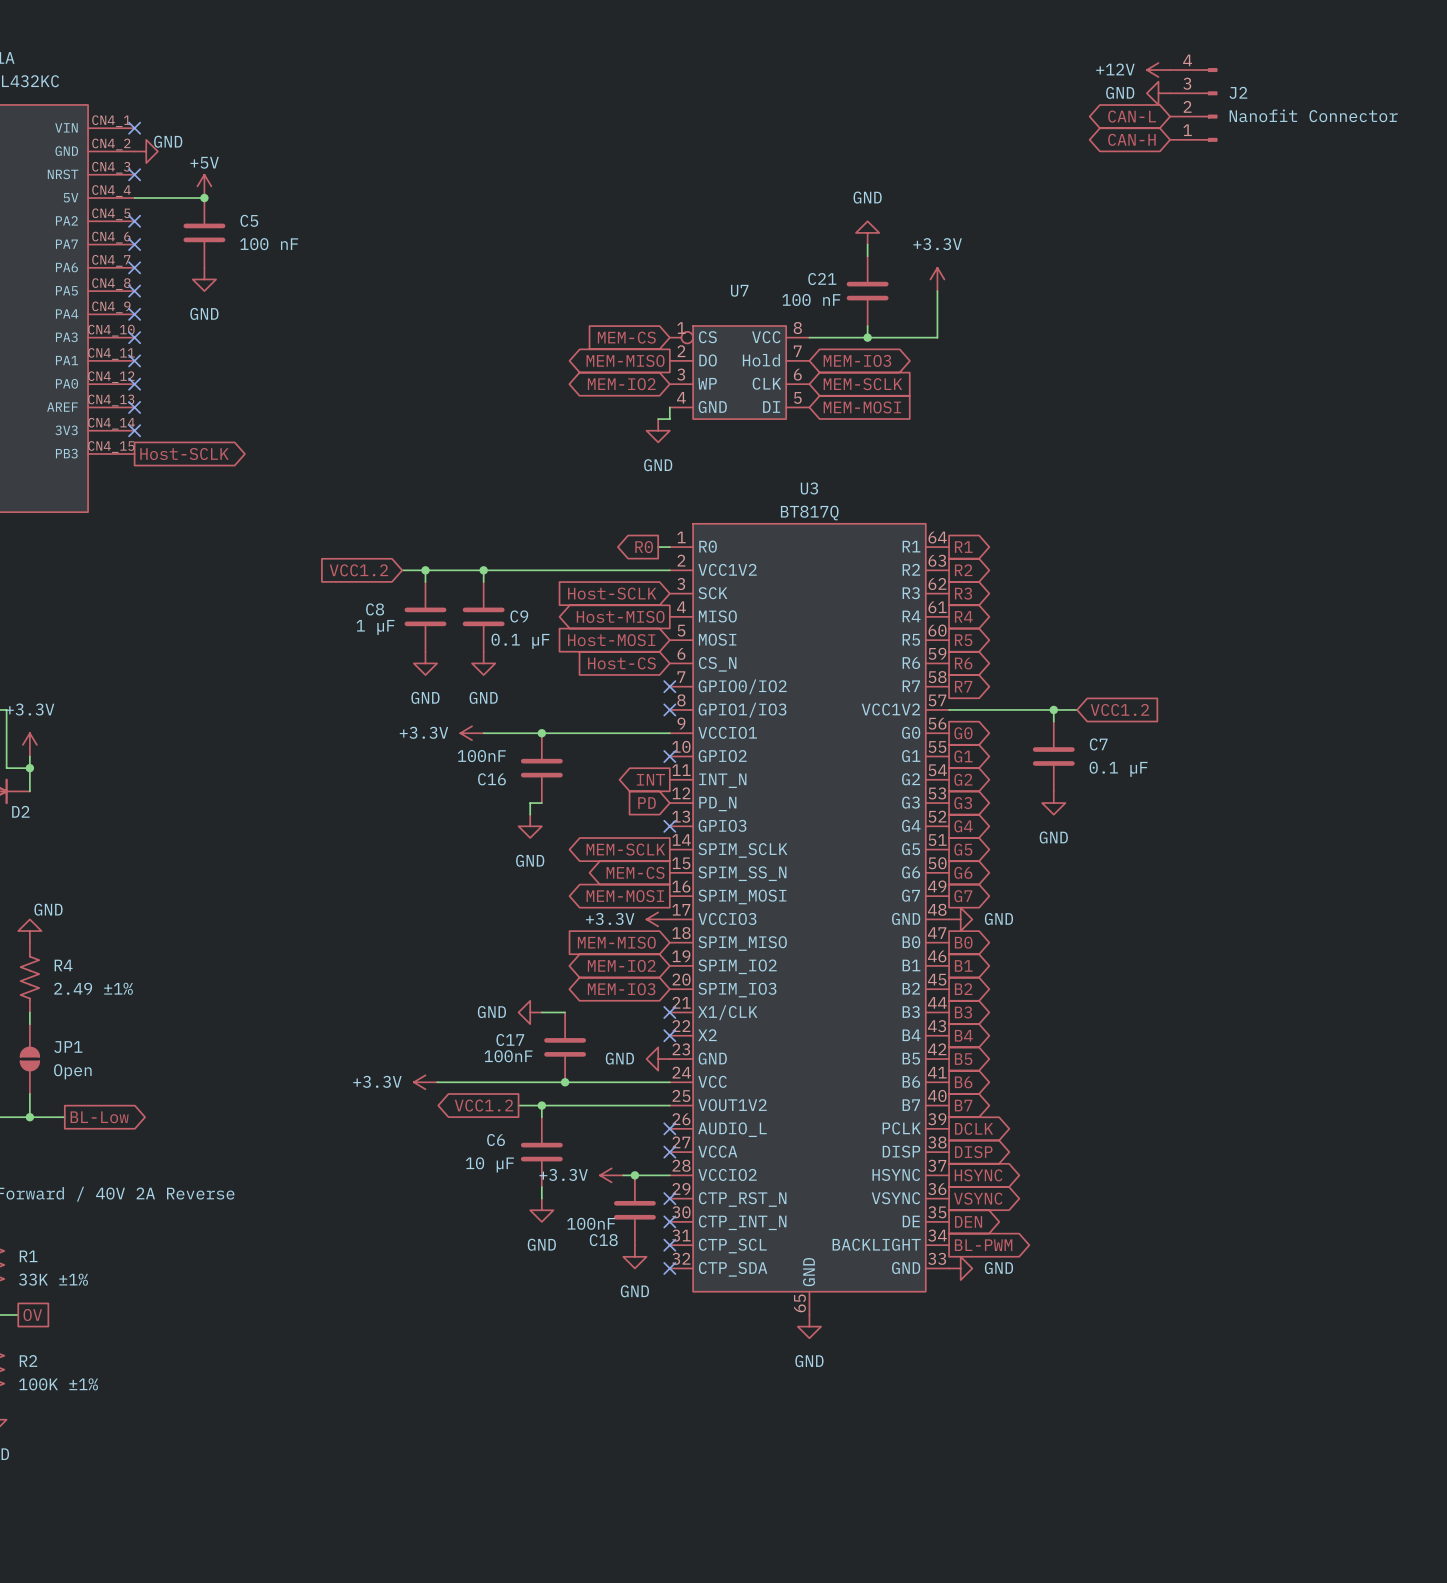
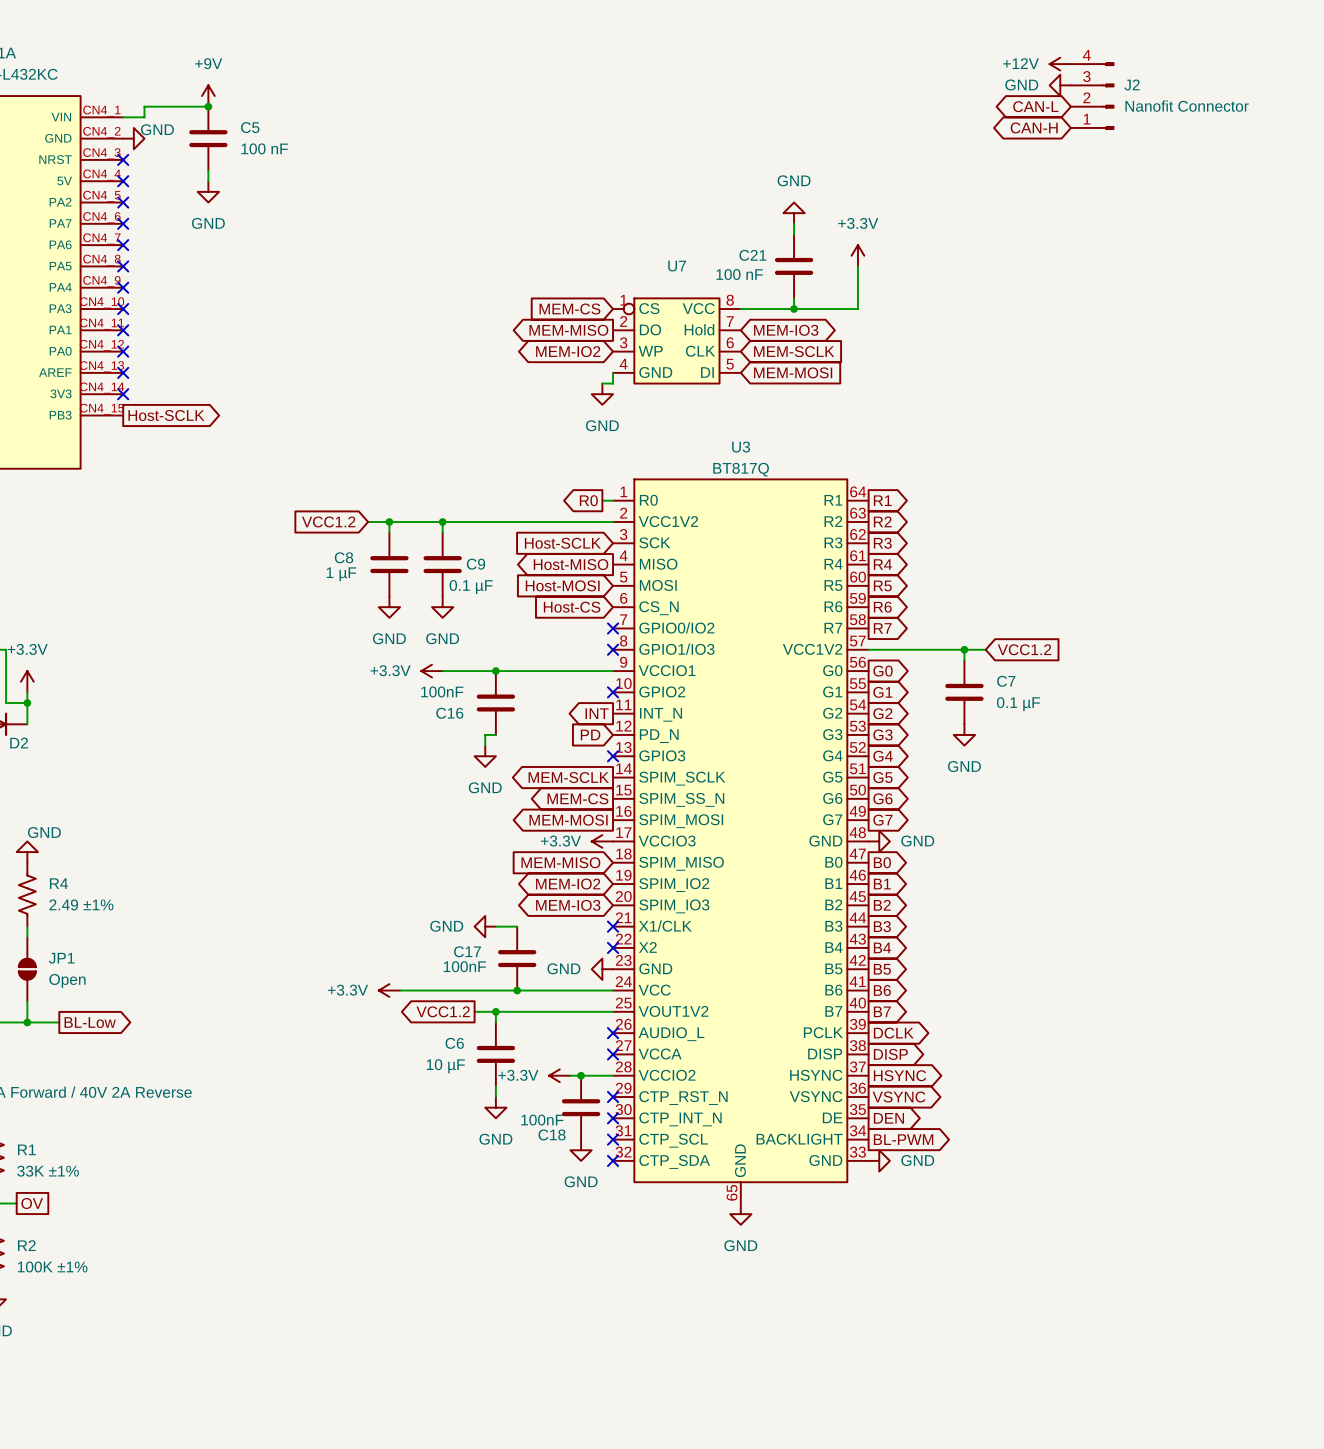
power symbol: none -> +9V (208, 96)
wire: none -> (208, 106) (144, 106) (144, 117) (123, 117)
junction: none -> (208, 106)
no-connect mark: (134, 128) -> none
power symbol: +5V (204, 186) -> none
wire: none -> (208, 170) (208, 181)
wire: (134, 198) (204, 198) -> none
no-connect mark: none -> (123, 181)
junction: (204, 198) -> none
C5 position: (204, 232) -> (208, 138)
power symbol position: GND (204, 279) -> GND (208, 191)

